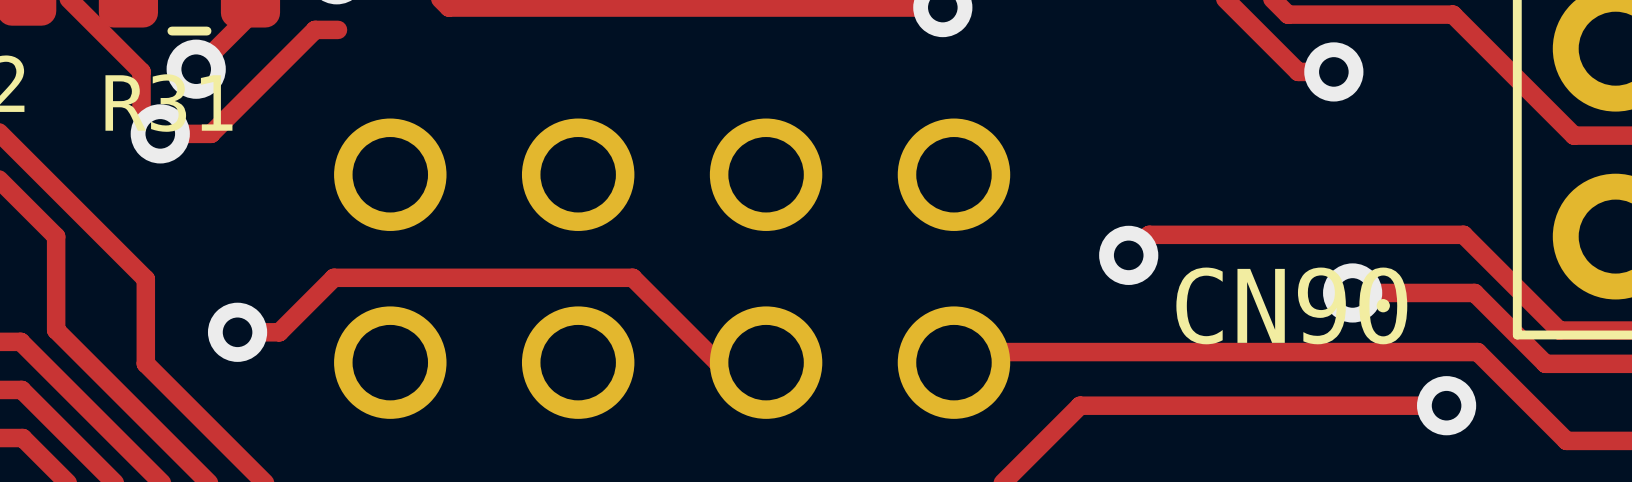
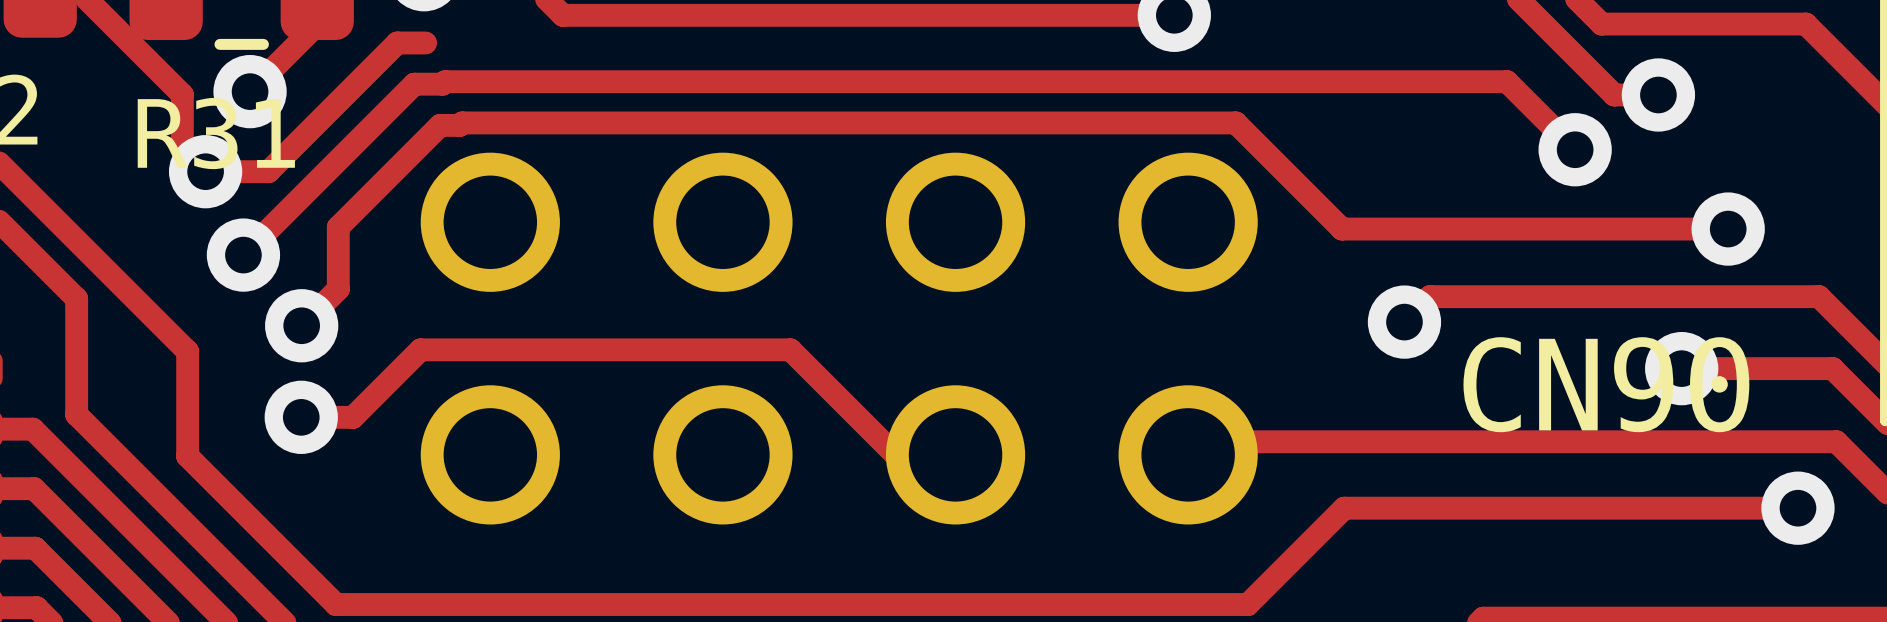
track: none -> (1575, 149) (1507, 81) (445, 81) (442, 84) (414, 84) (243, 255)
via: none -> (1575, 149)
track: none -> (1728, 229) (1341, 229) (1235, 122) (462, 122) (459, 125) (440, 125) (338, 227) (338, 289) (301, 325)
via: none -> (1728, 229)
via: none -> (243, 255)
via: none -> (301, 325)

